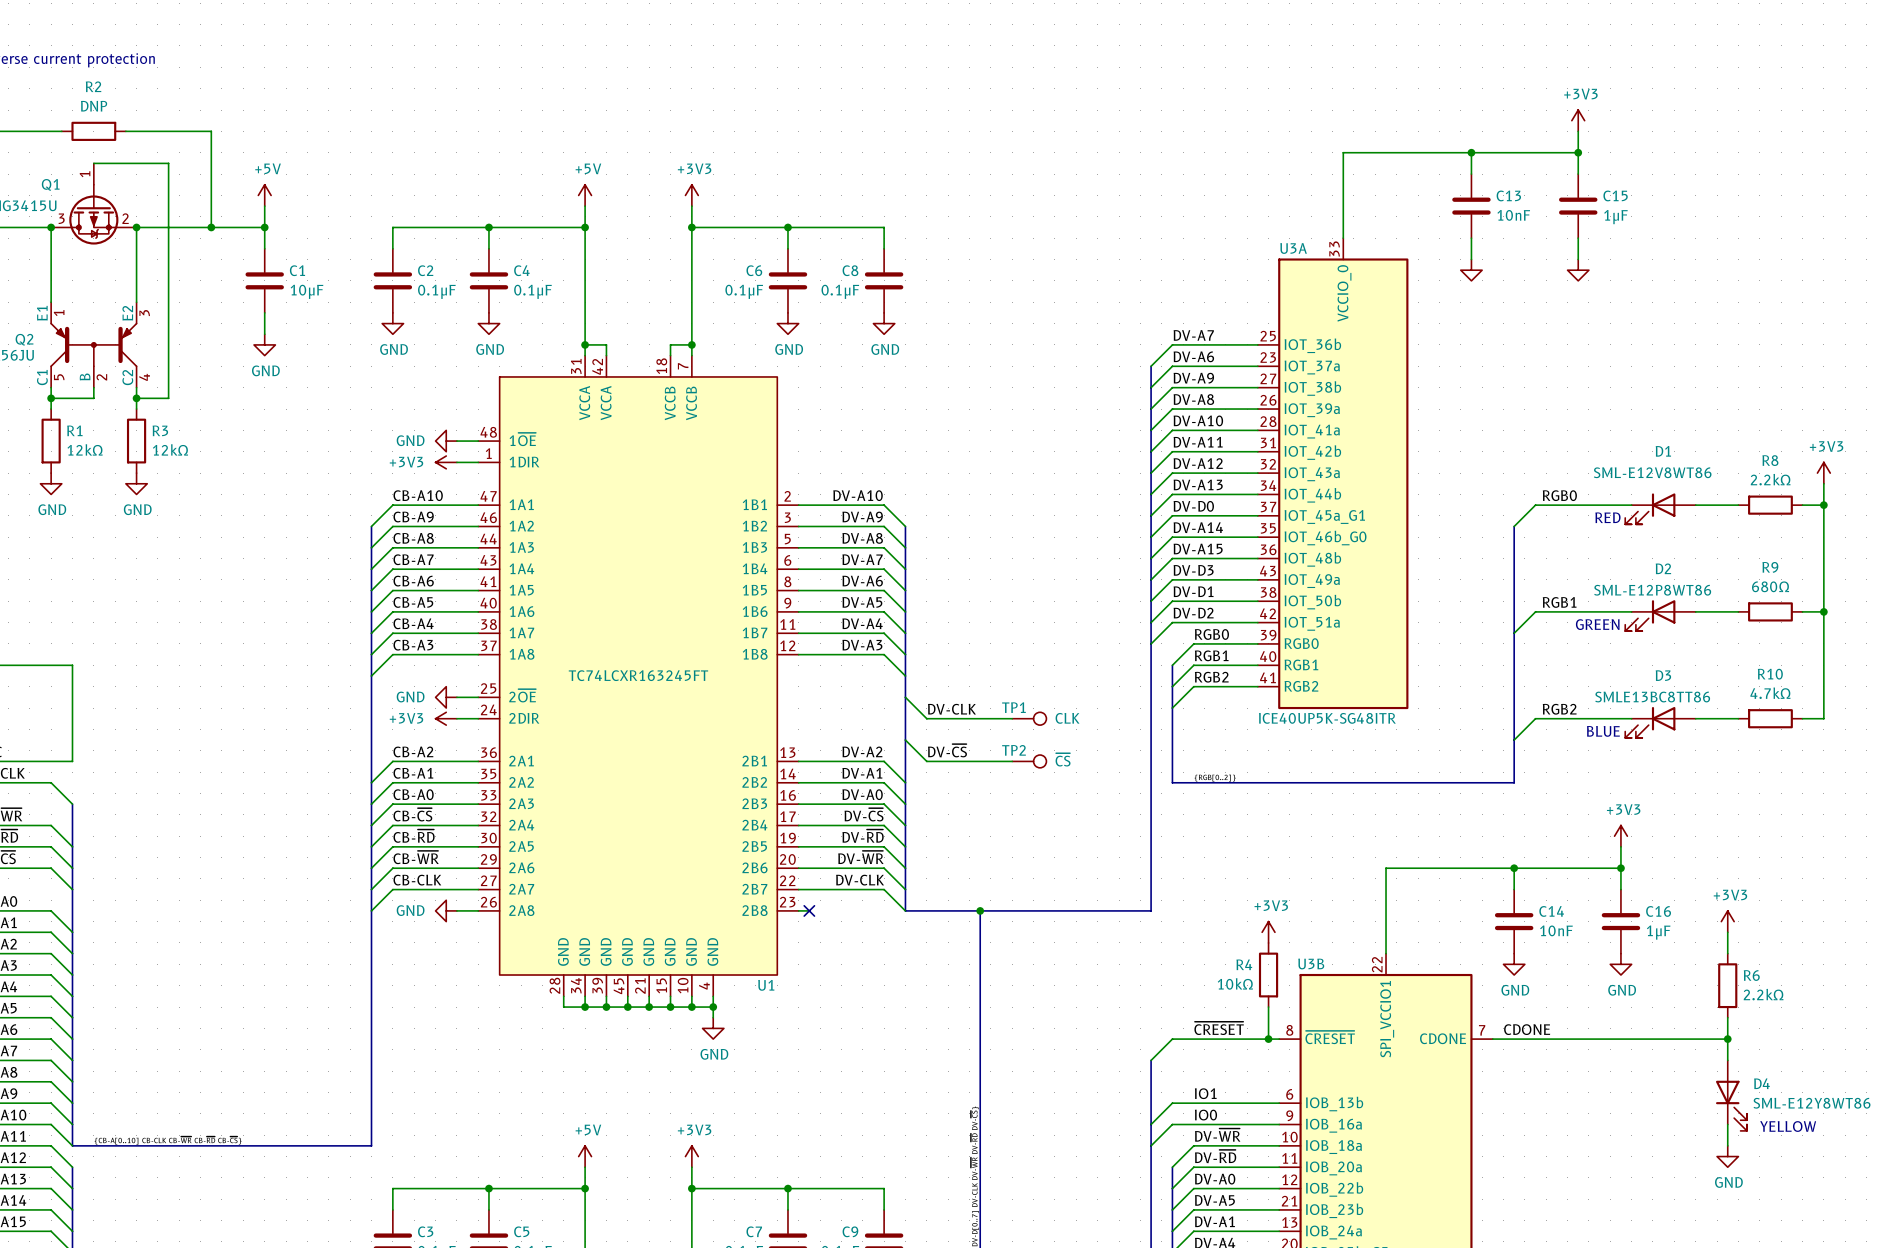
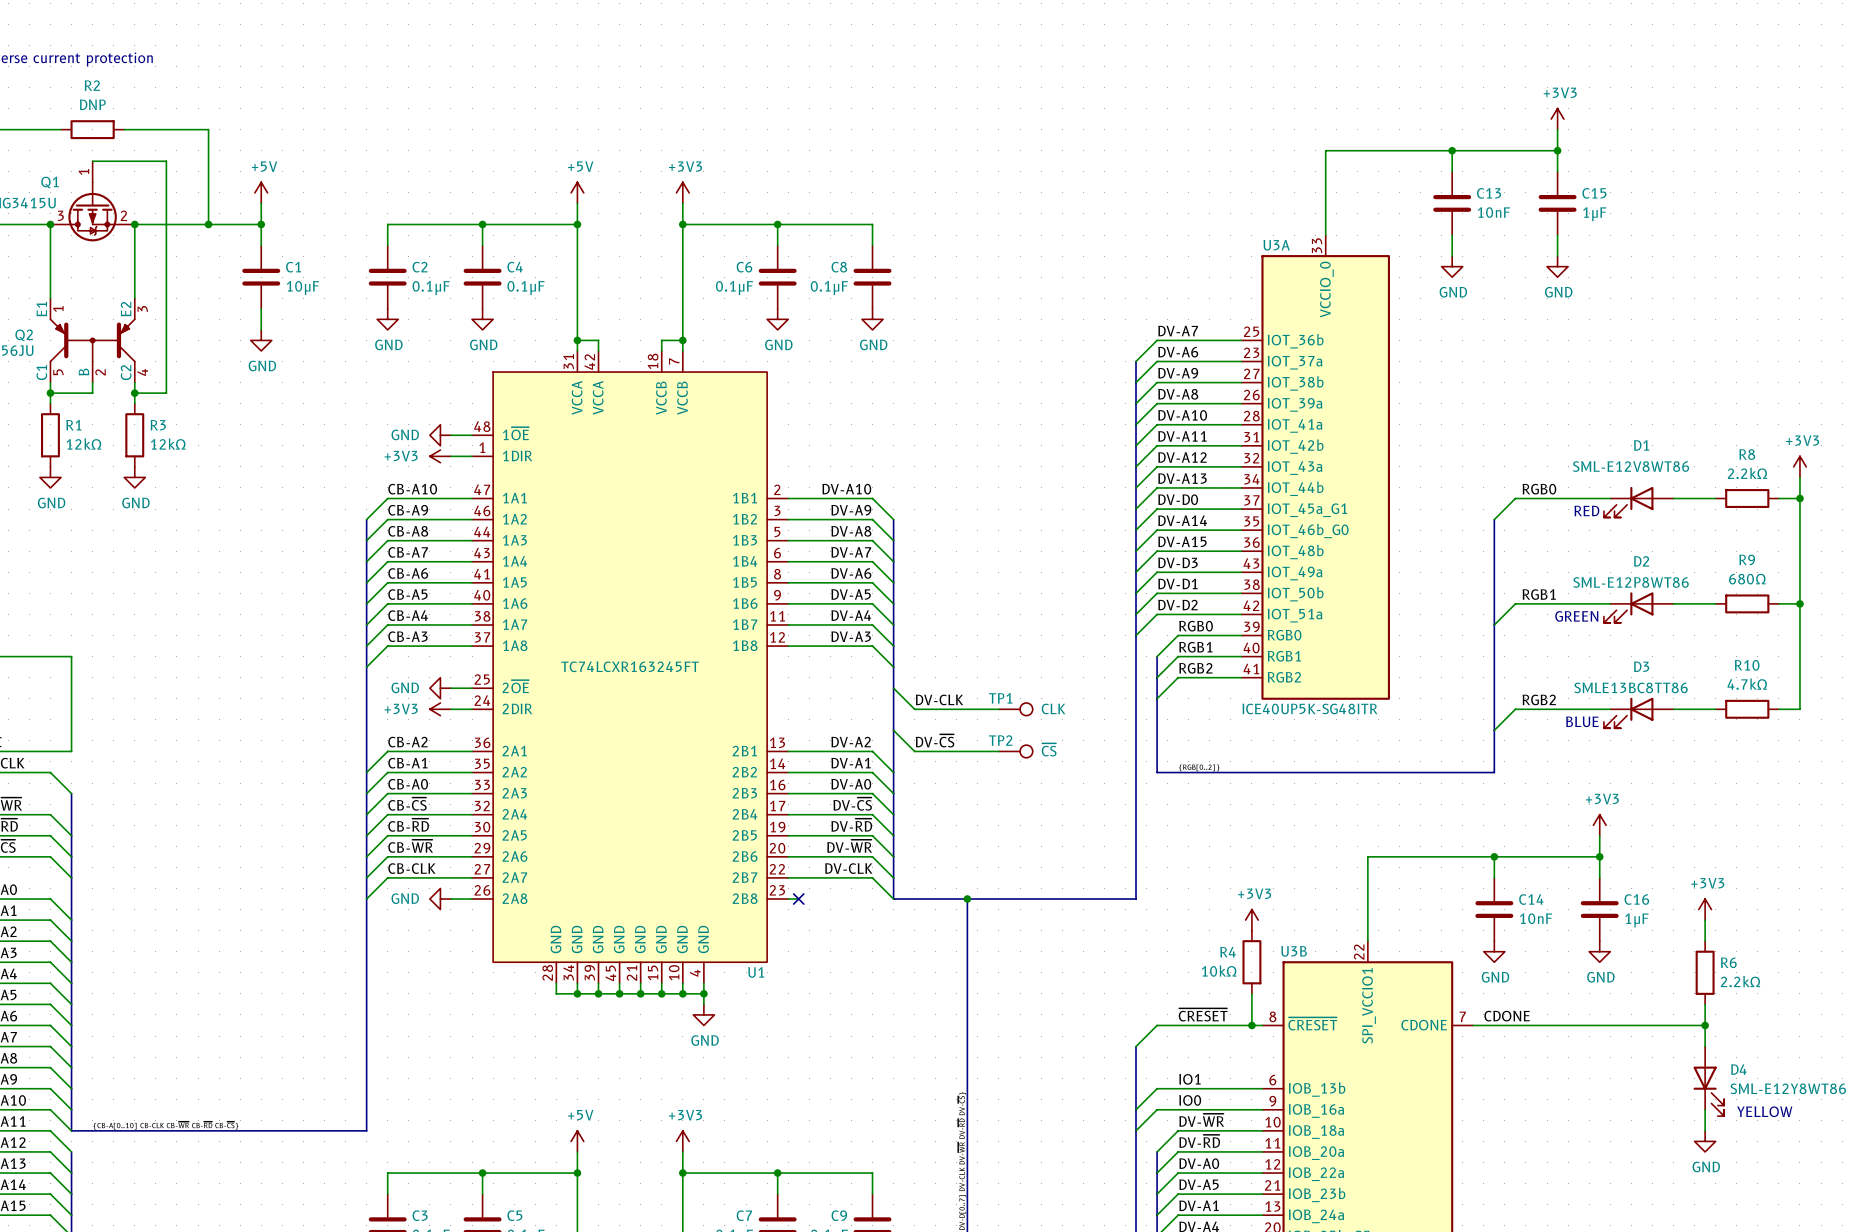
power symbol text: none -> GND (1453, 292)
power symbol text: none -> GND (1558, 292)
U3B pin name: IOB_22b (1334, 1189) -> IOB_22a (1316, 1174)

